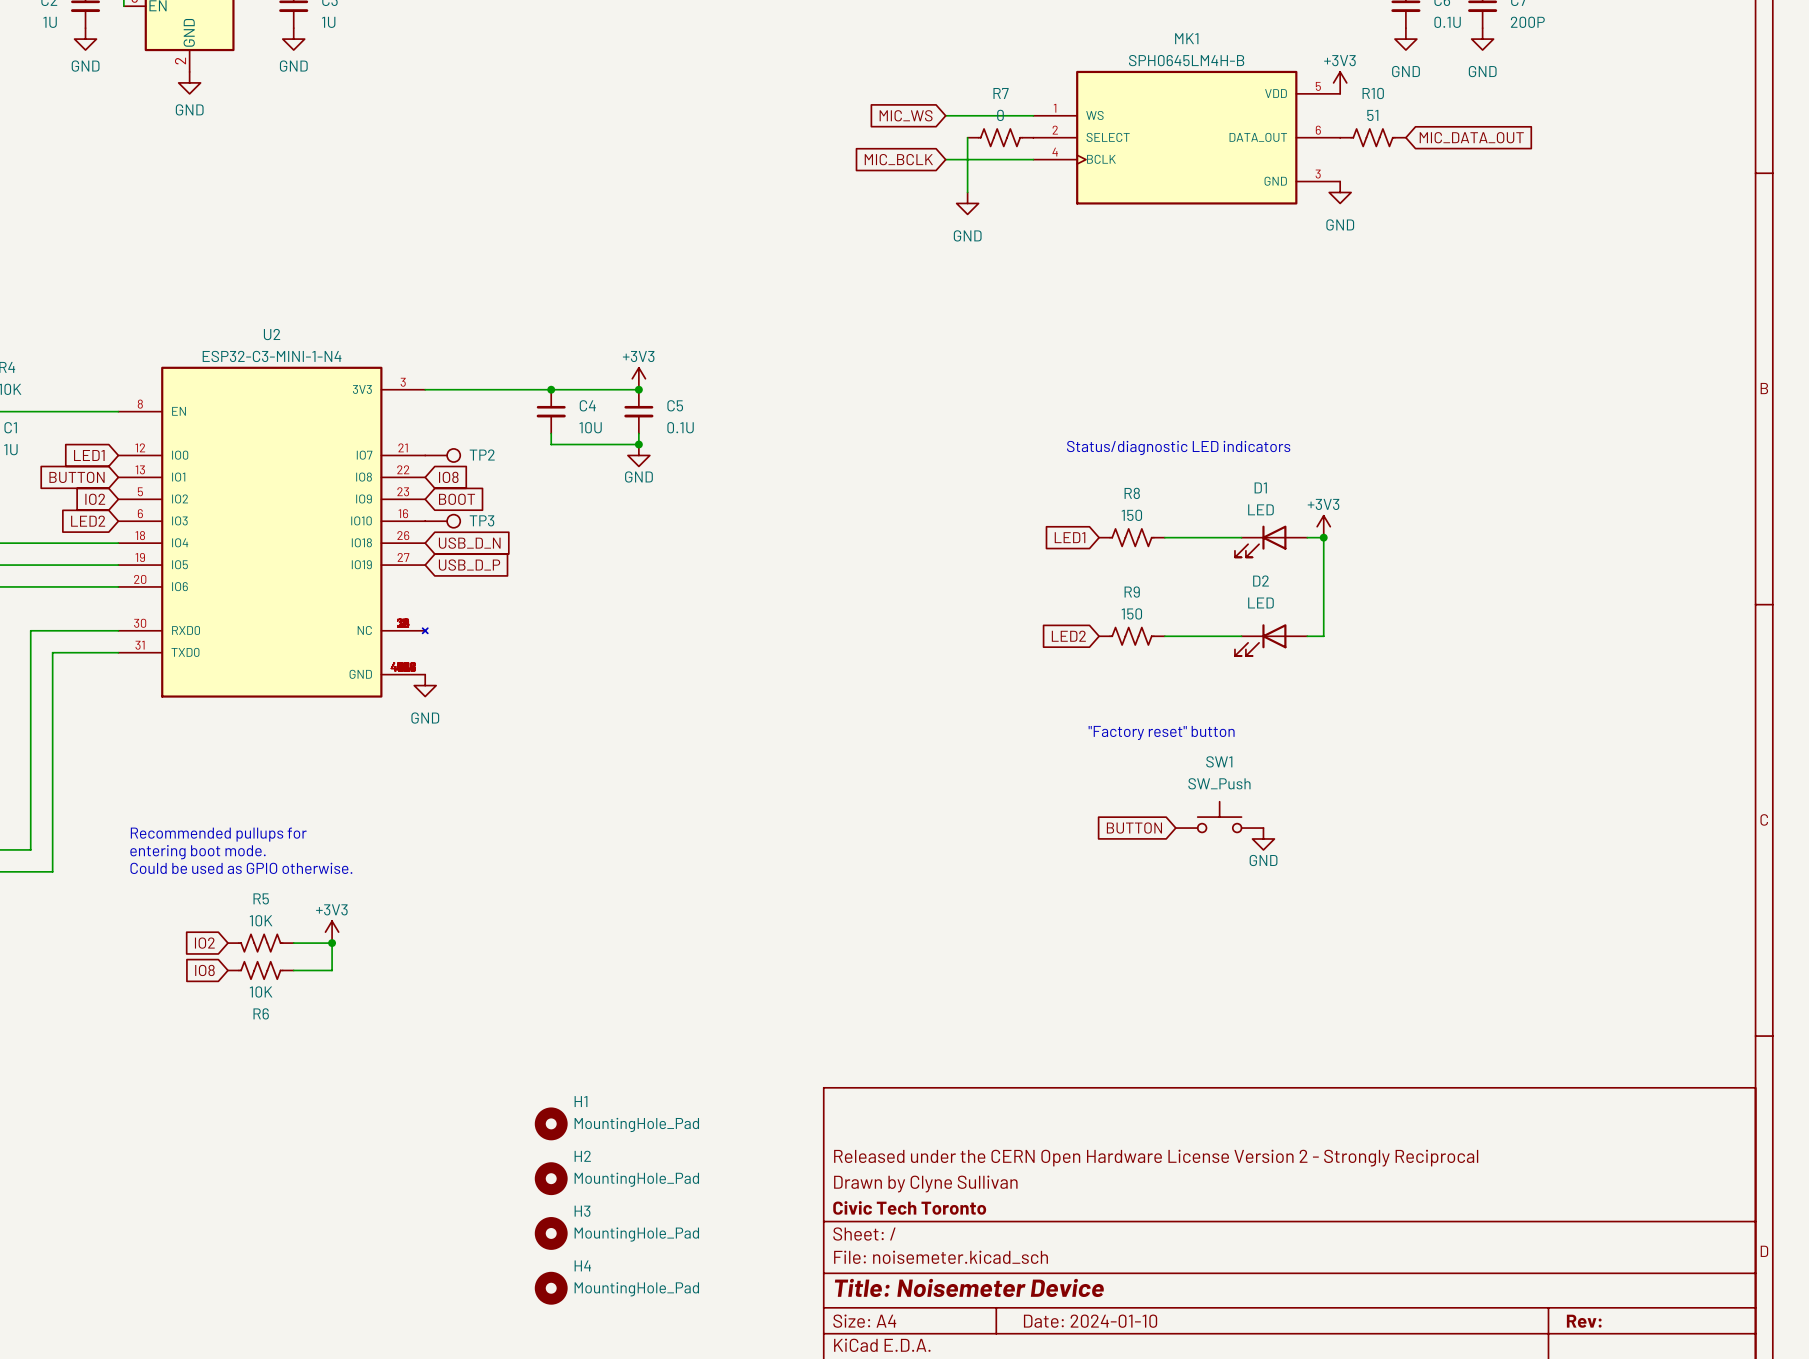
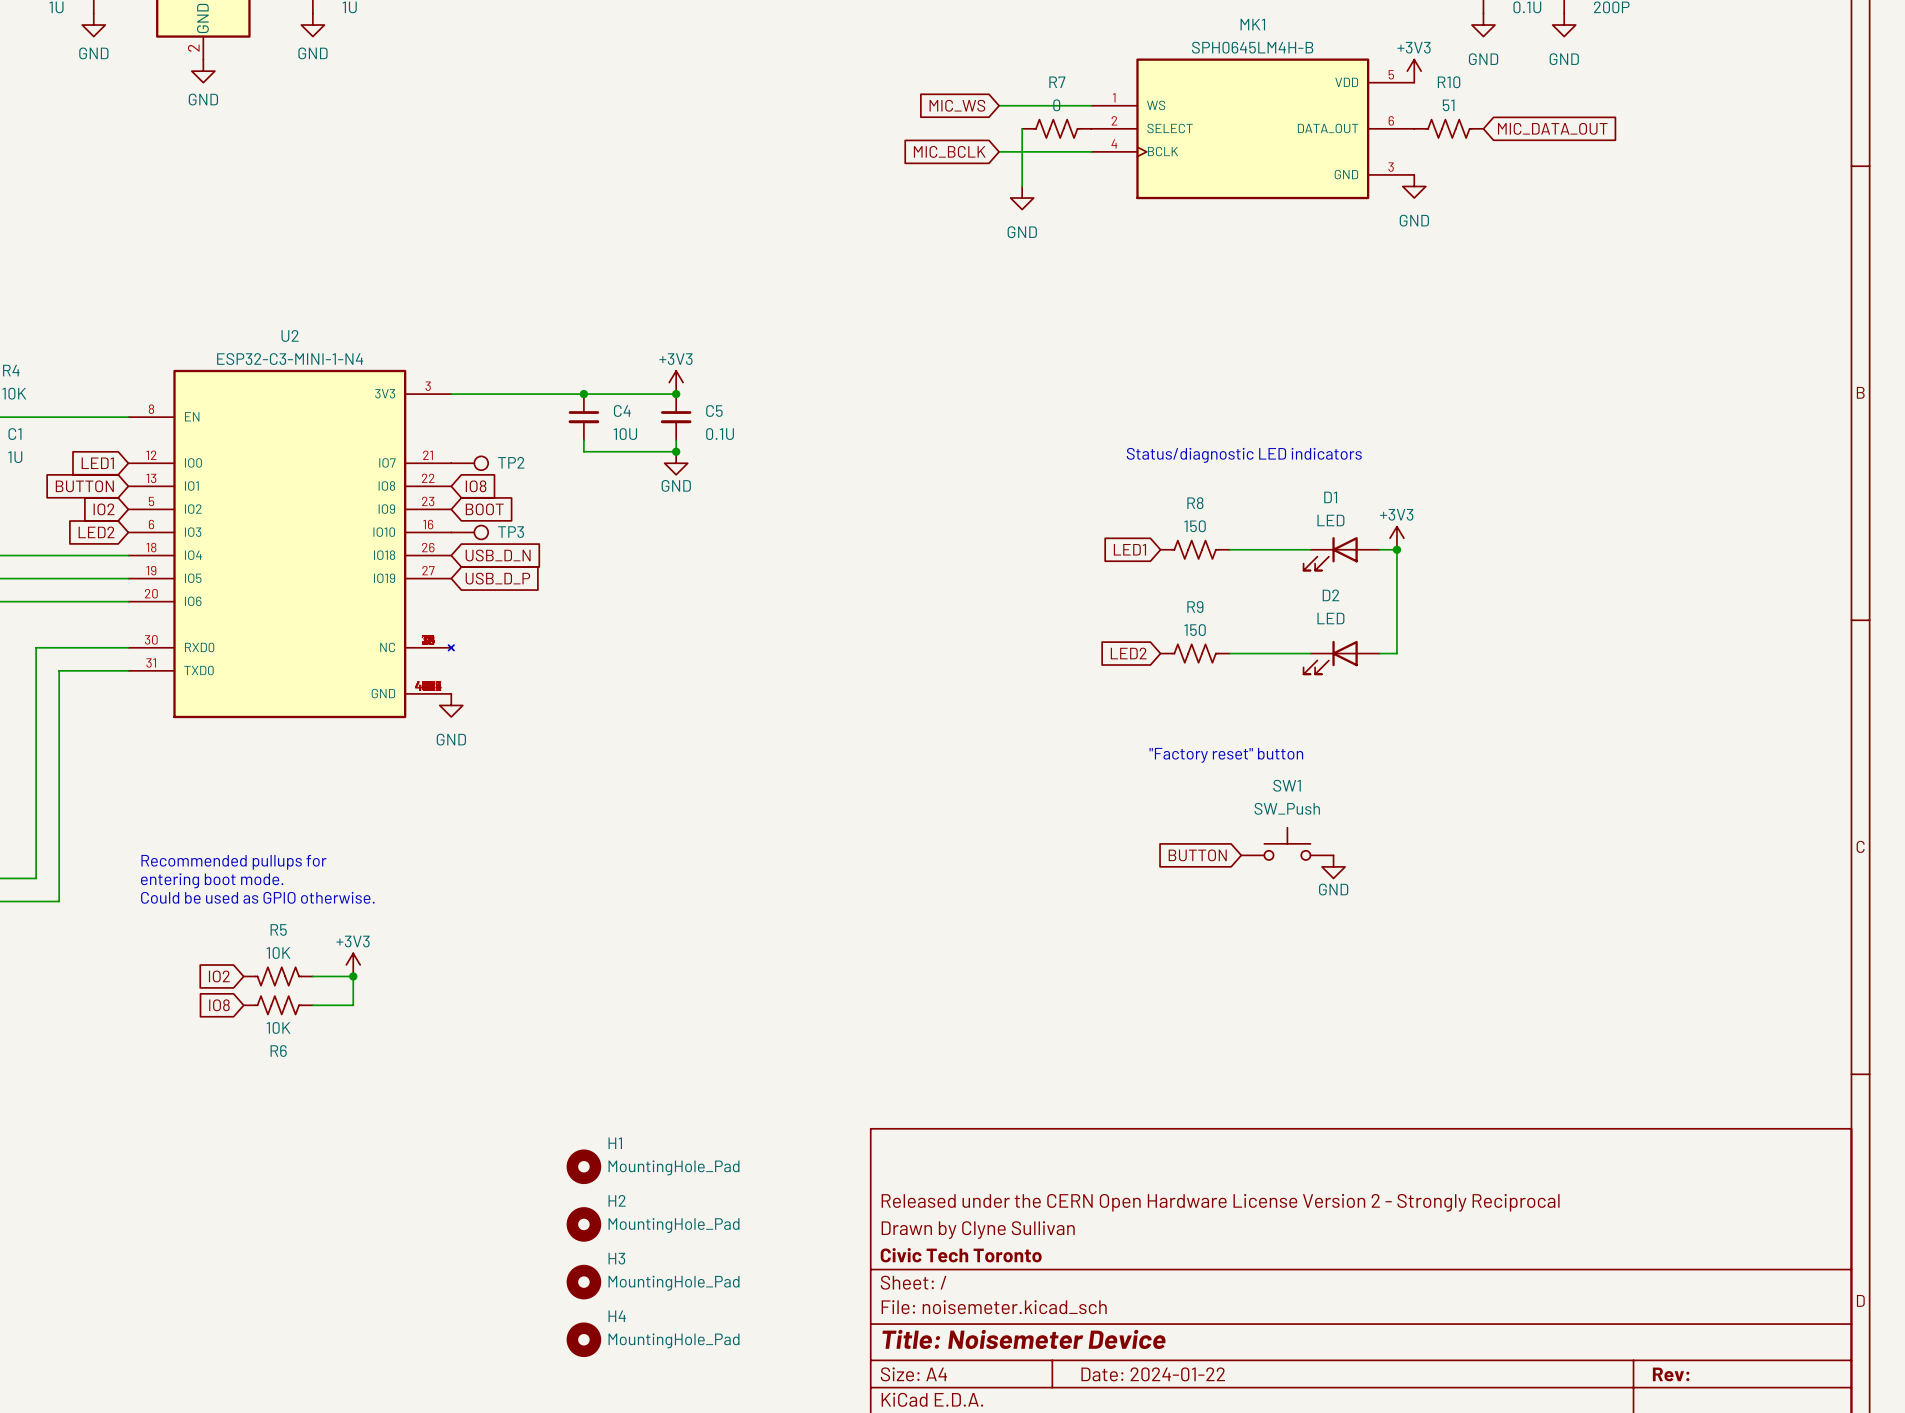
title block: Date: 2024-01-10 (1090, 1321) -> Date: 2024-01-22 (1153, 1374)

